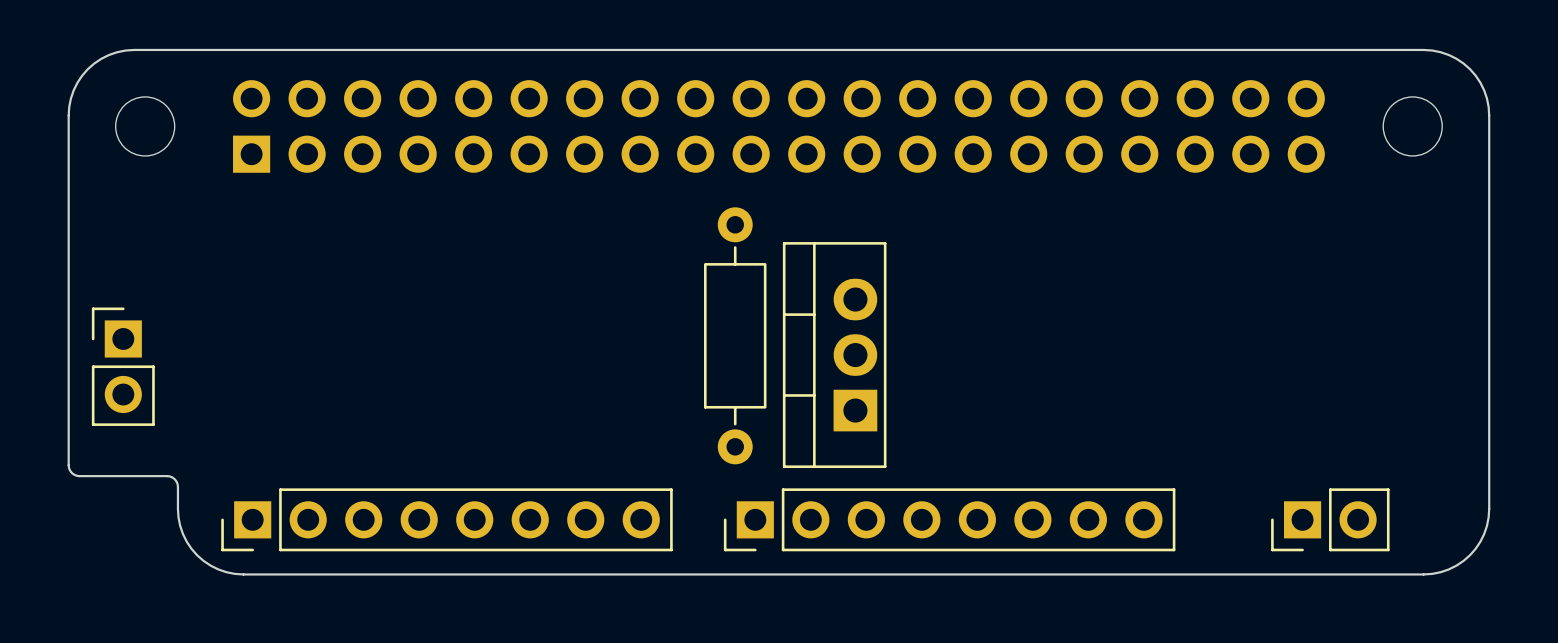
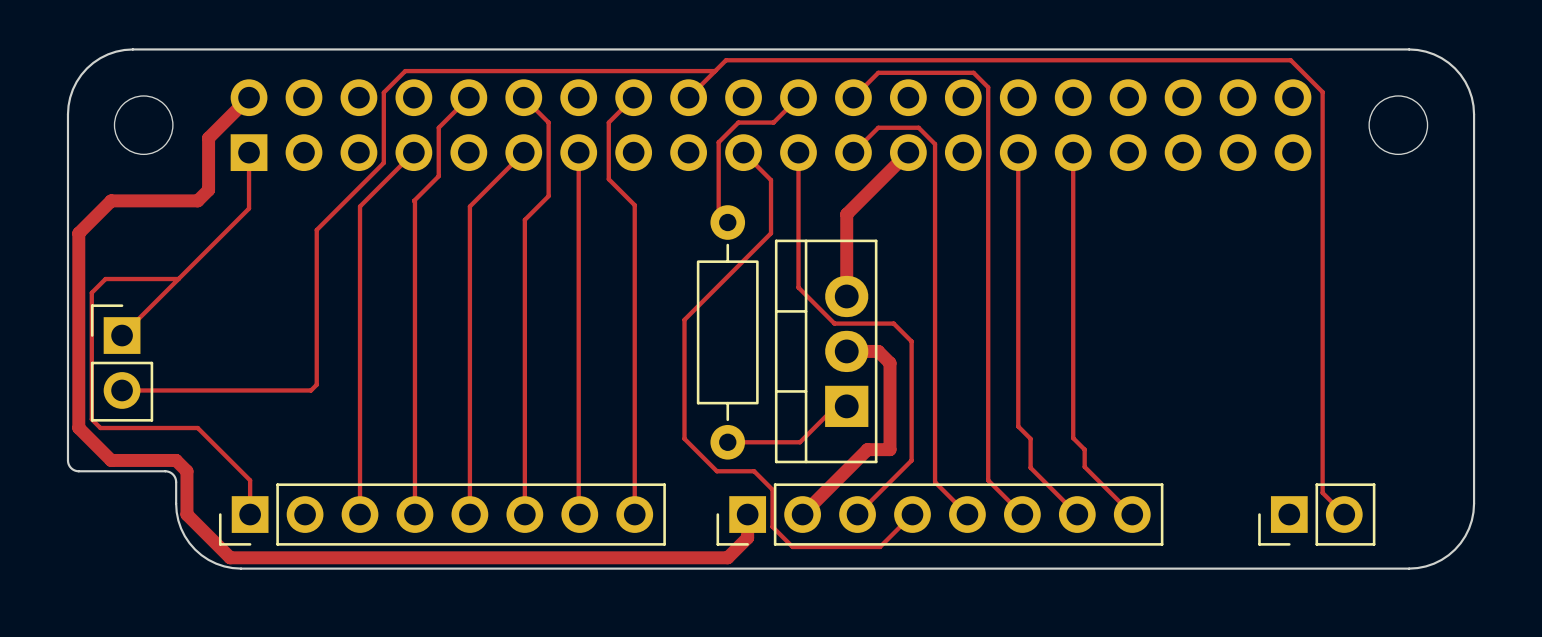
track: none -> (715, 71) (405, 71) (383, 92) (383, 162) (316, 230) (316, 384) (311, 390) (122, 390)
track: none -> (249, 97) (208, 138) (208, 190) (197, 200) (111, 200) (78, 233) (78, 428) (111, 460) (176, 460) (186, 471) (186, 514) (230, 557) (727, 557) (747, 537) (747, 514)
track: none -> (468, 97) (438, 127) (438, 176) (414, 200) (414, 514)
track: none -> (523, 97) (548, 122) (548, 196) (524, 219) (524, 514)
track: none -> (633, 97) (608, 122) (608, 179) (634, 205) (634, 514)
track: none -> (688, 97) (726, 60) (1290, 60) (1322, 92) (1322, 492) (1344, 514)
track: none -> (798, 97) (773, 122) (738, 122) (718, 142) (718, 213) (727, 222)
track: none -> (853, 97) (878, 72) (973, 72) (988, 87) (988, 480) (1022, 514)
track: none -> (249, 152) (249, 208) (122, 335)
track: none -> (413, 152) (360, 206) (360, 514)
track: none -> (523, 152) (469, 206) (469, 514)
track: none -> (578, 152) (579, 514)
track: none -> (743, 152) (771, 180) (771, 233) (684, 319) (684, 438) (716, 471) (754, 471) (772, 489) (772, 526) (792, 546) (880, 546) (912, 514)
track: none -> (798, 152) (798, 287) (834, 323) (893, 323) (911, 341) (911, 460) (857, 514)
track: none -> (853, 152) (878, 127) (918, 127) (935, 144) (935, 482) (967, 514)
track: none -> (908, 152) (846, 214) (846, 296)
track: none -> (1018, 152) (1018, 426) (1030, 438) (1030, 467) (1077, 514)
track: none -> (1073, 152) (1073, 438) (1084, 449) (1084, 466) (1132, 514)
track: none -> (178, 279) (105, 279) (91, 292) (91, 419) (100, 428) (197, 428) (250, 480) (250, 514) (241, 514)
track: none -> (846, 351) (878, 351) (890, 363) (890, 449) (867, 449) (802, 514)
track: none -> (846, 406) (835, 406) (800, 442) (727, 442)

